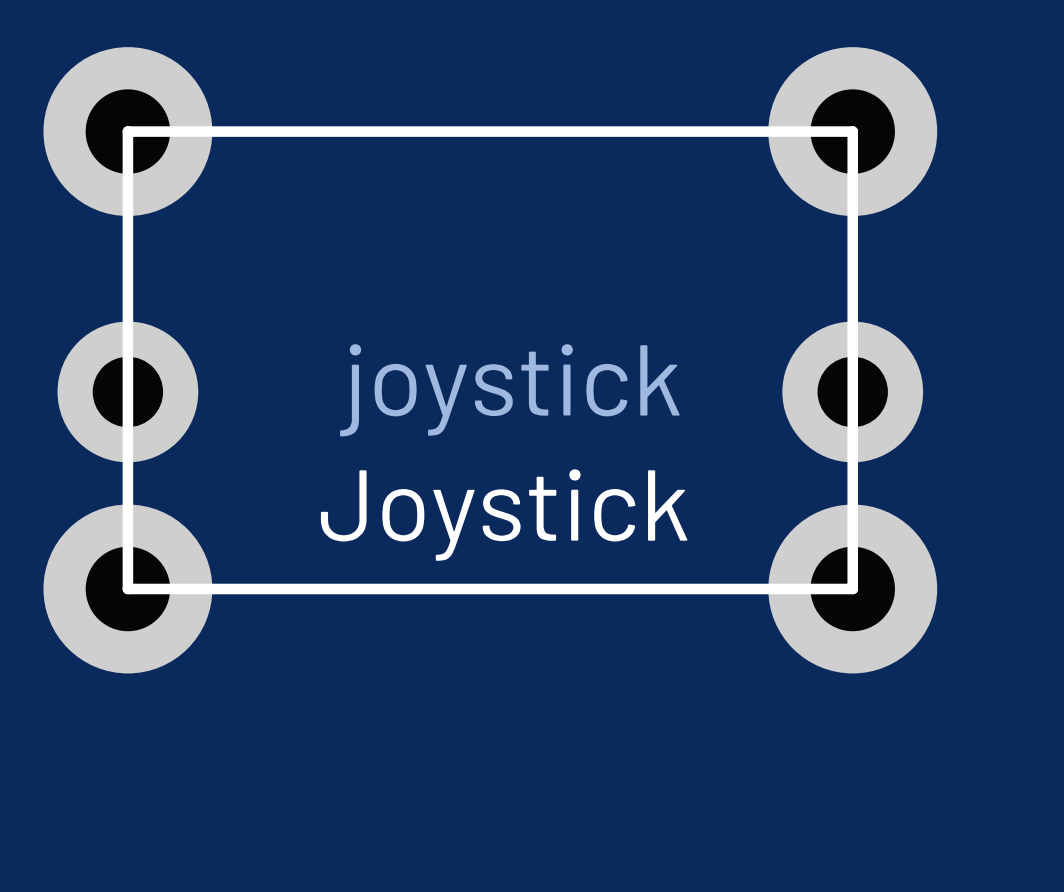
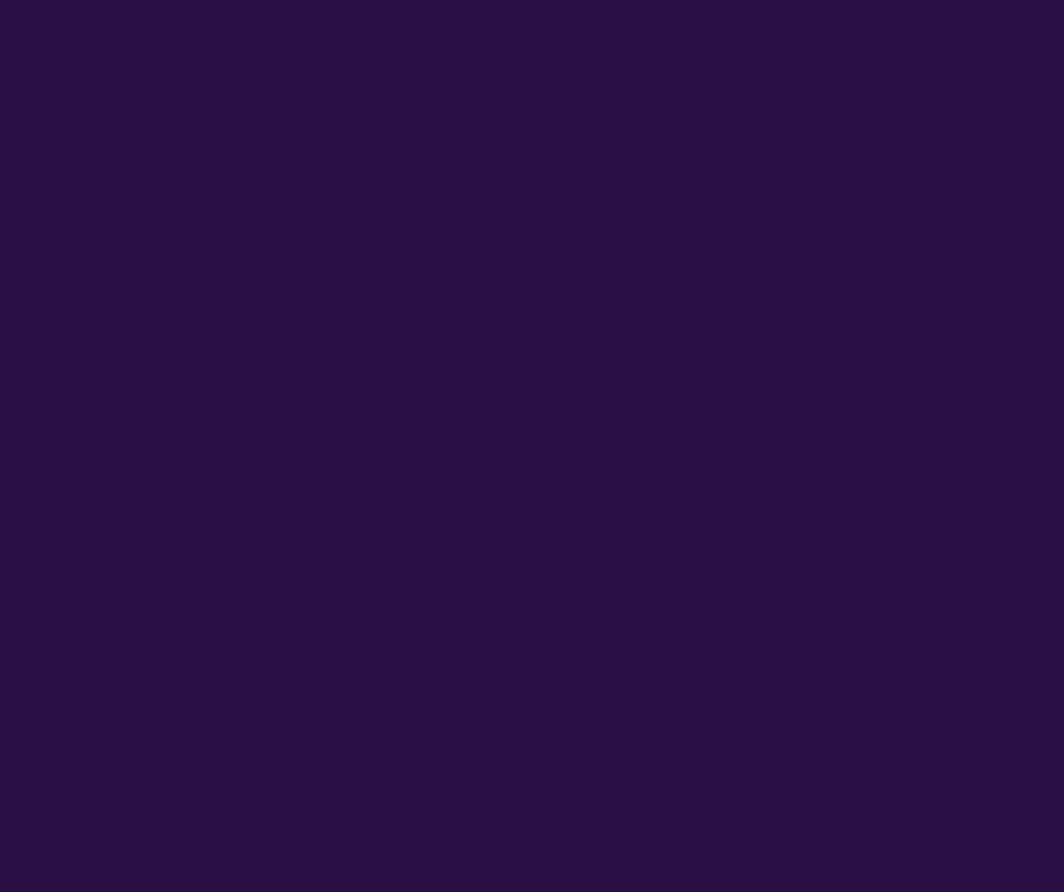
Joystick: joystick (490, 360) -> none

